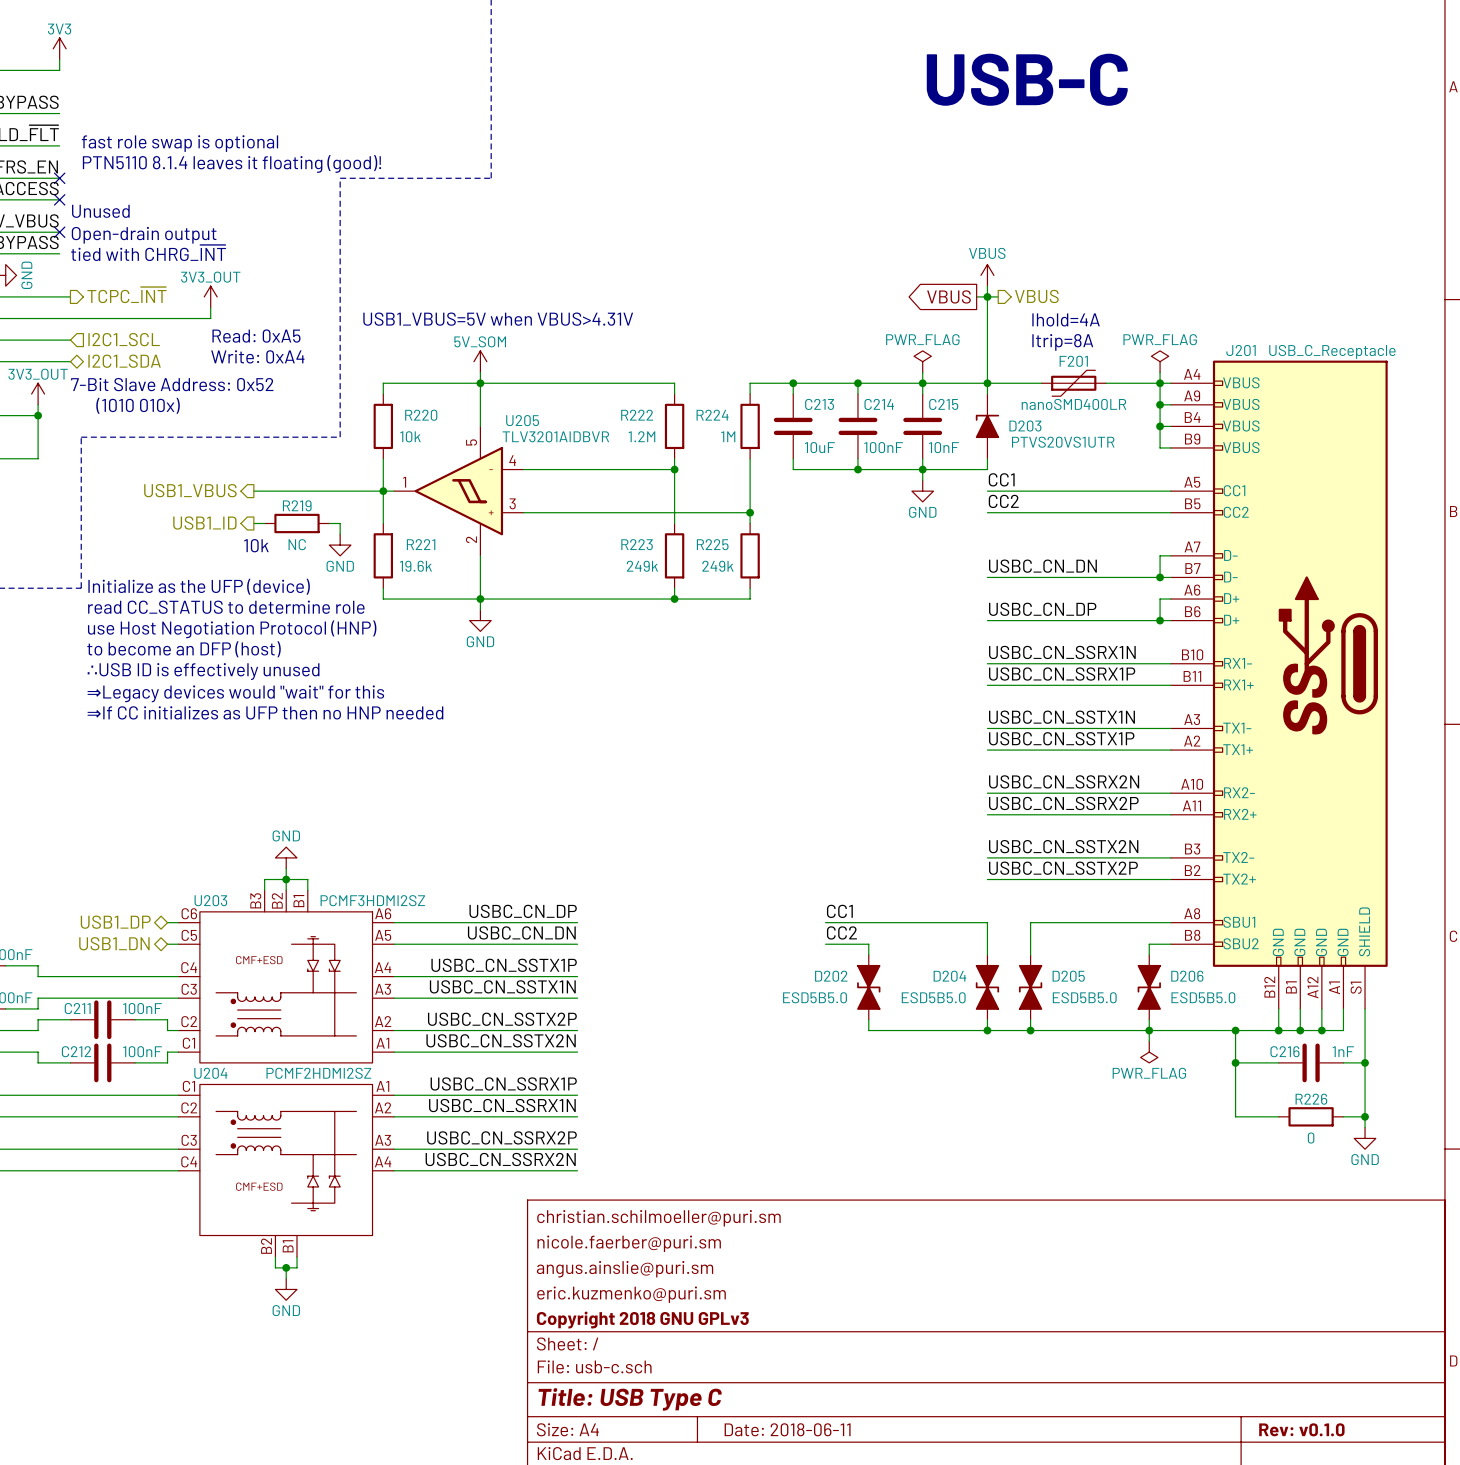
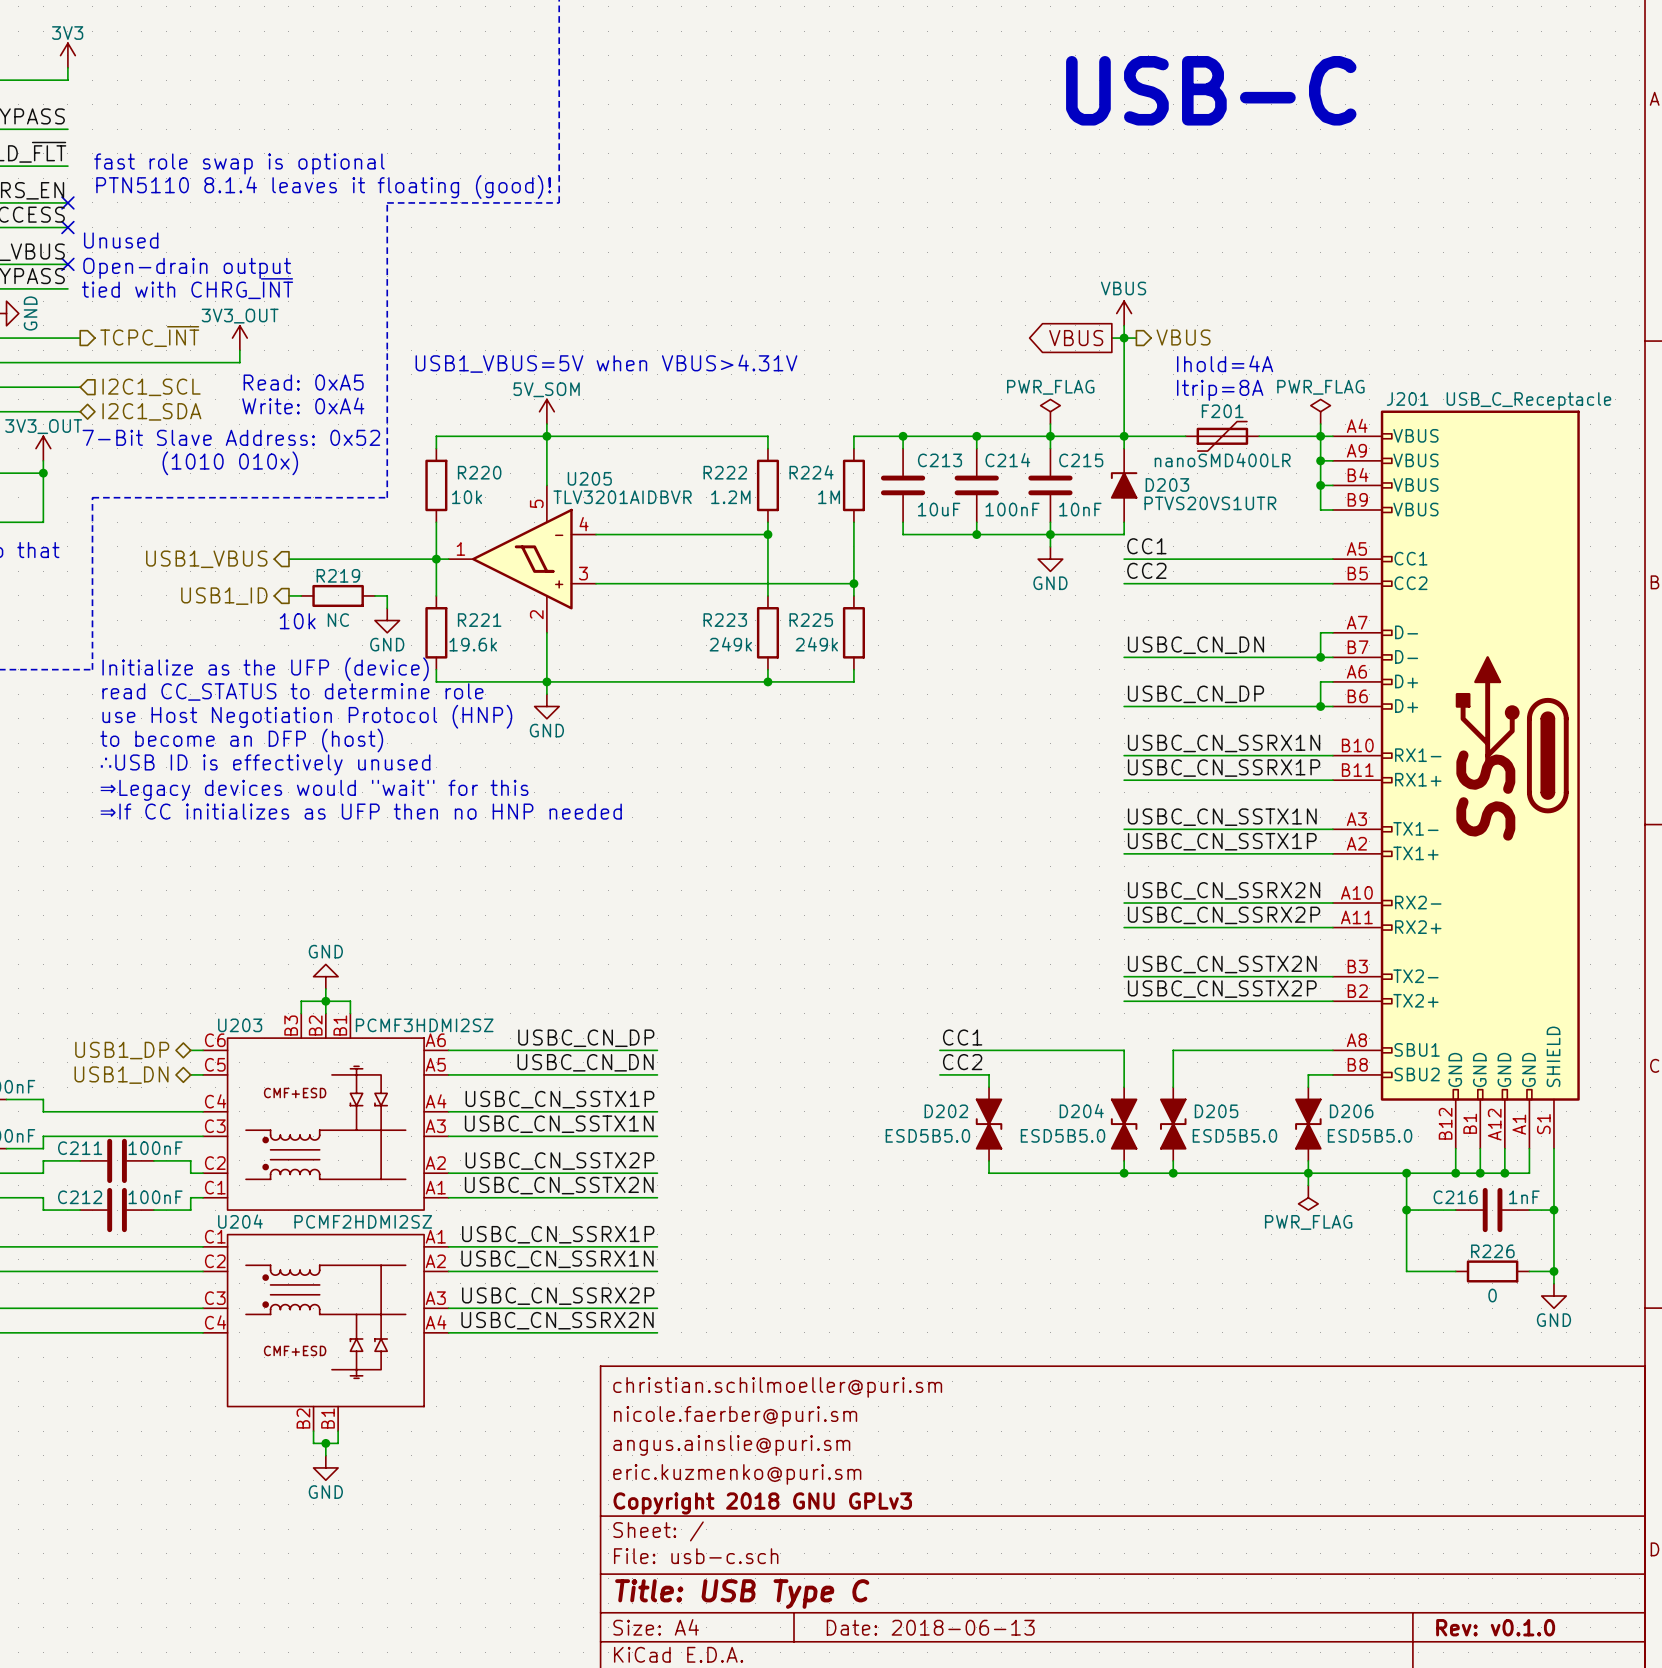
title block: Date: 2018-06-11 (787, 1429) -> Date: 2018-06-13 (930, 1627)

